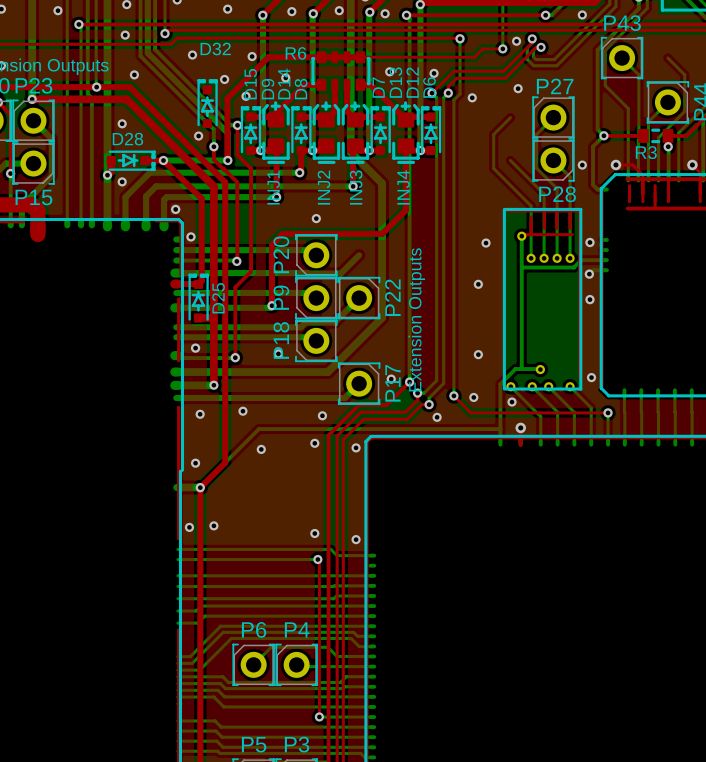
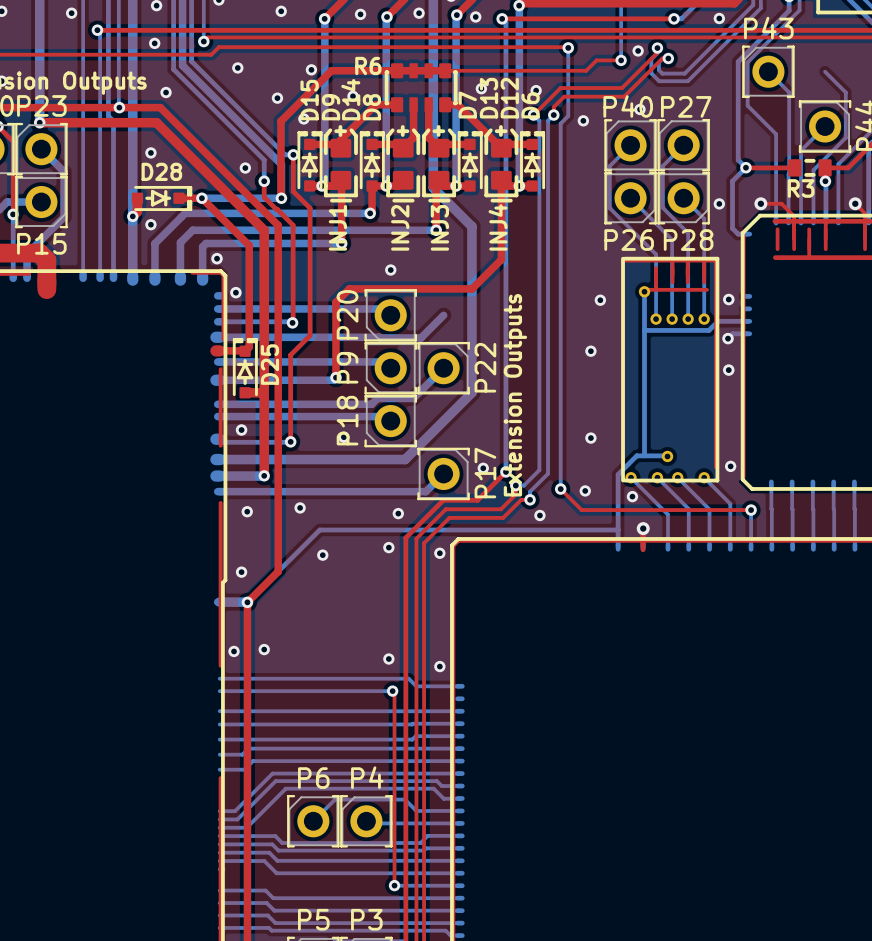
D32: (207, 103) -> none
P40: none -> (630, 145)
P26: none -> (630, 198)

